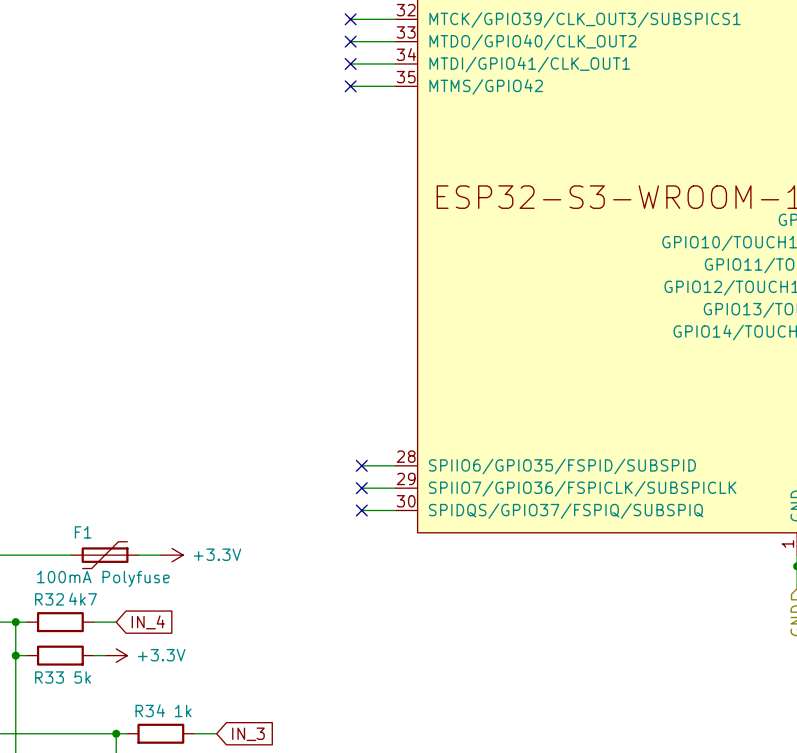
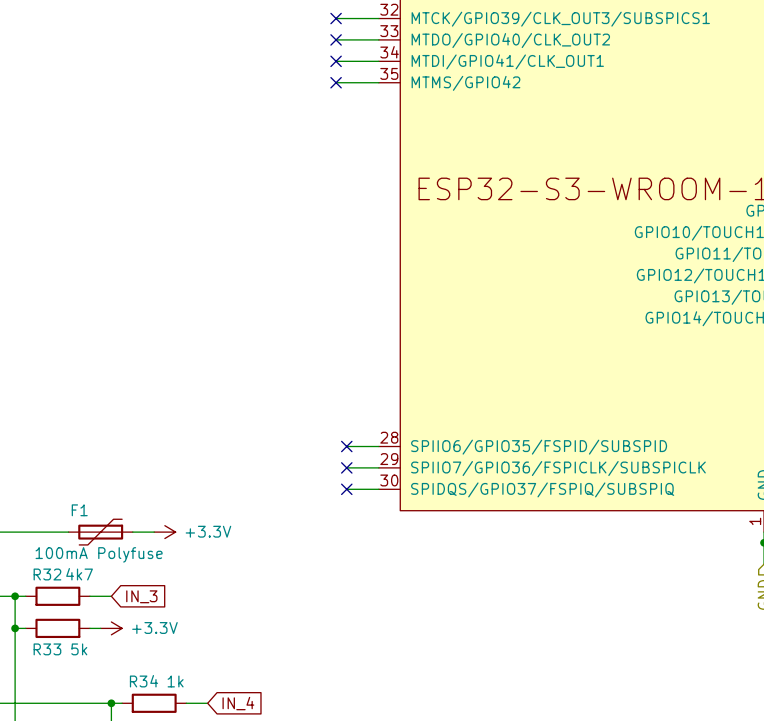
global label: IN_4 (148, 622) -> IN_3 (141, 596)
global label: IN_3 (248, 734) -> IN_4 (238, 703)

